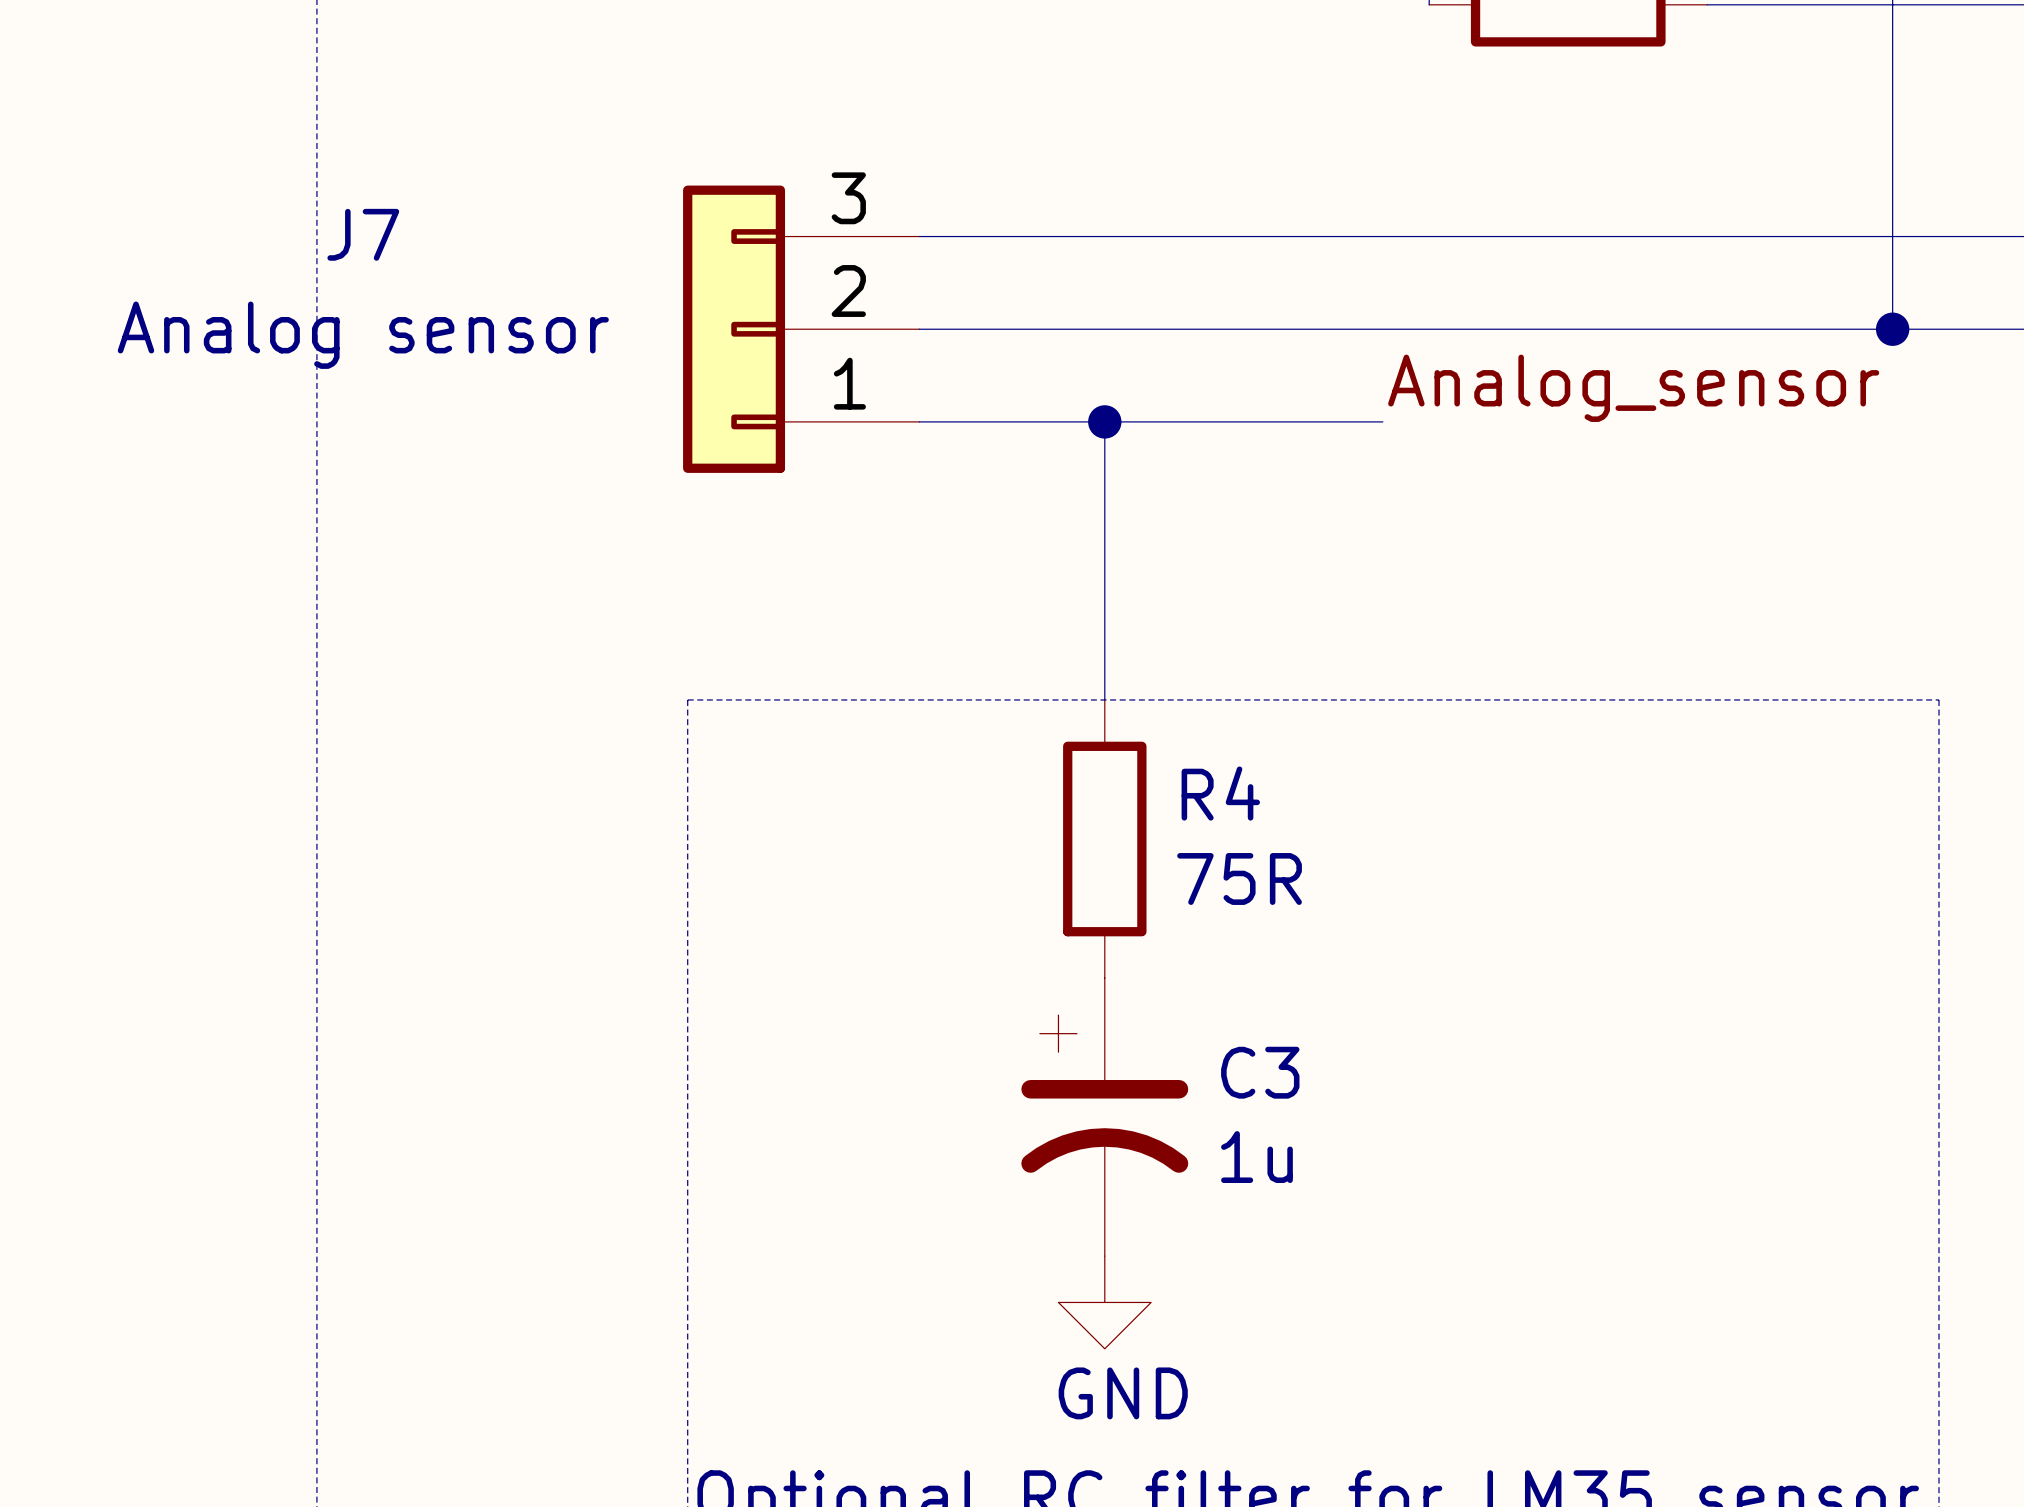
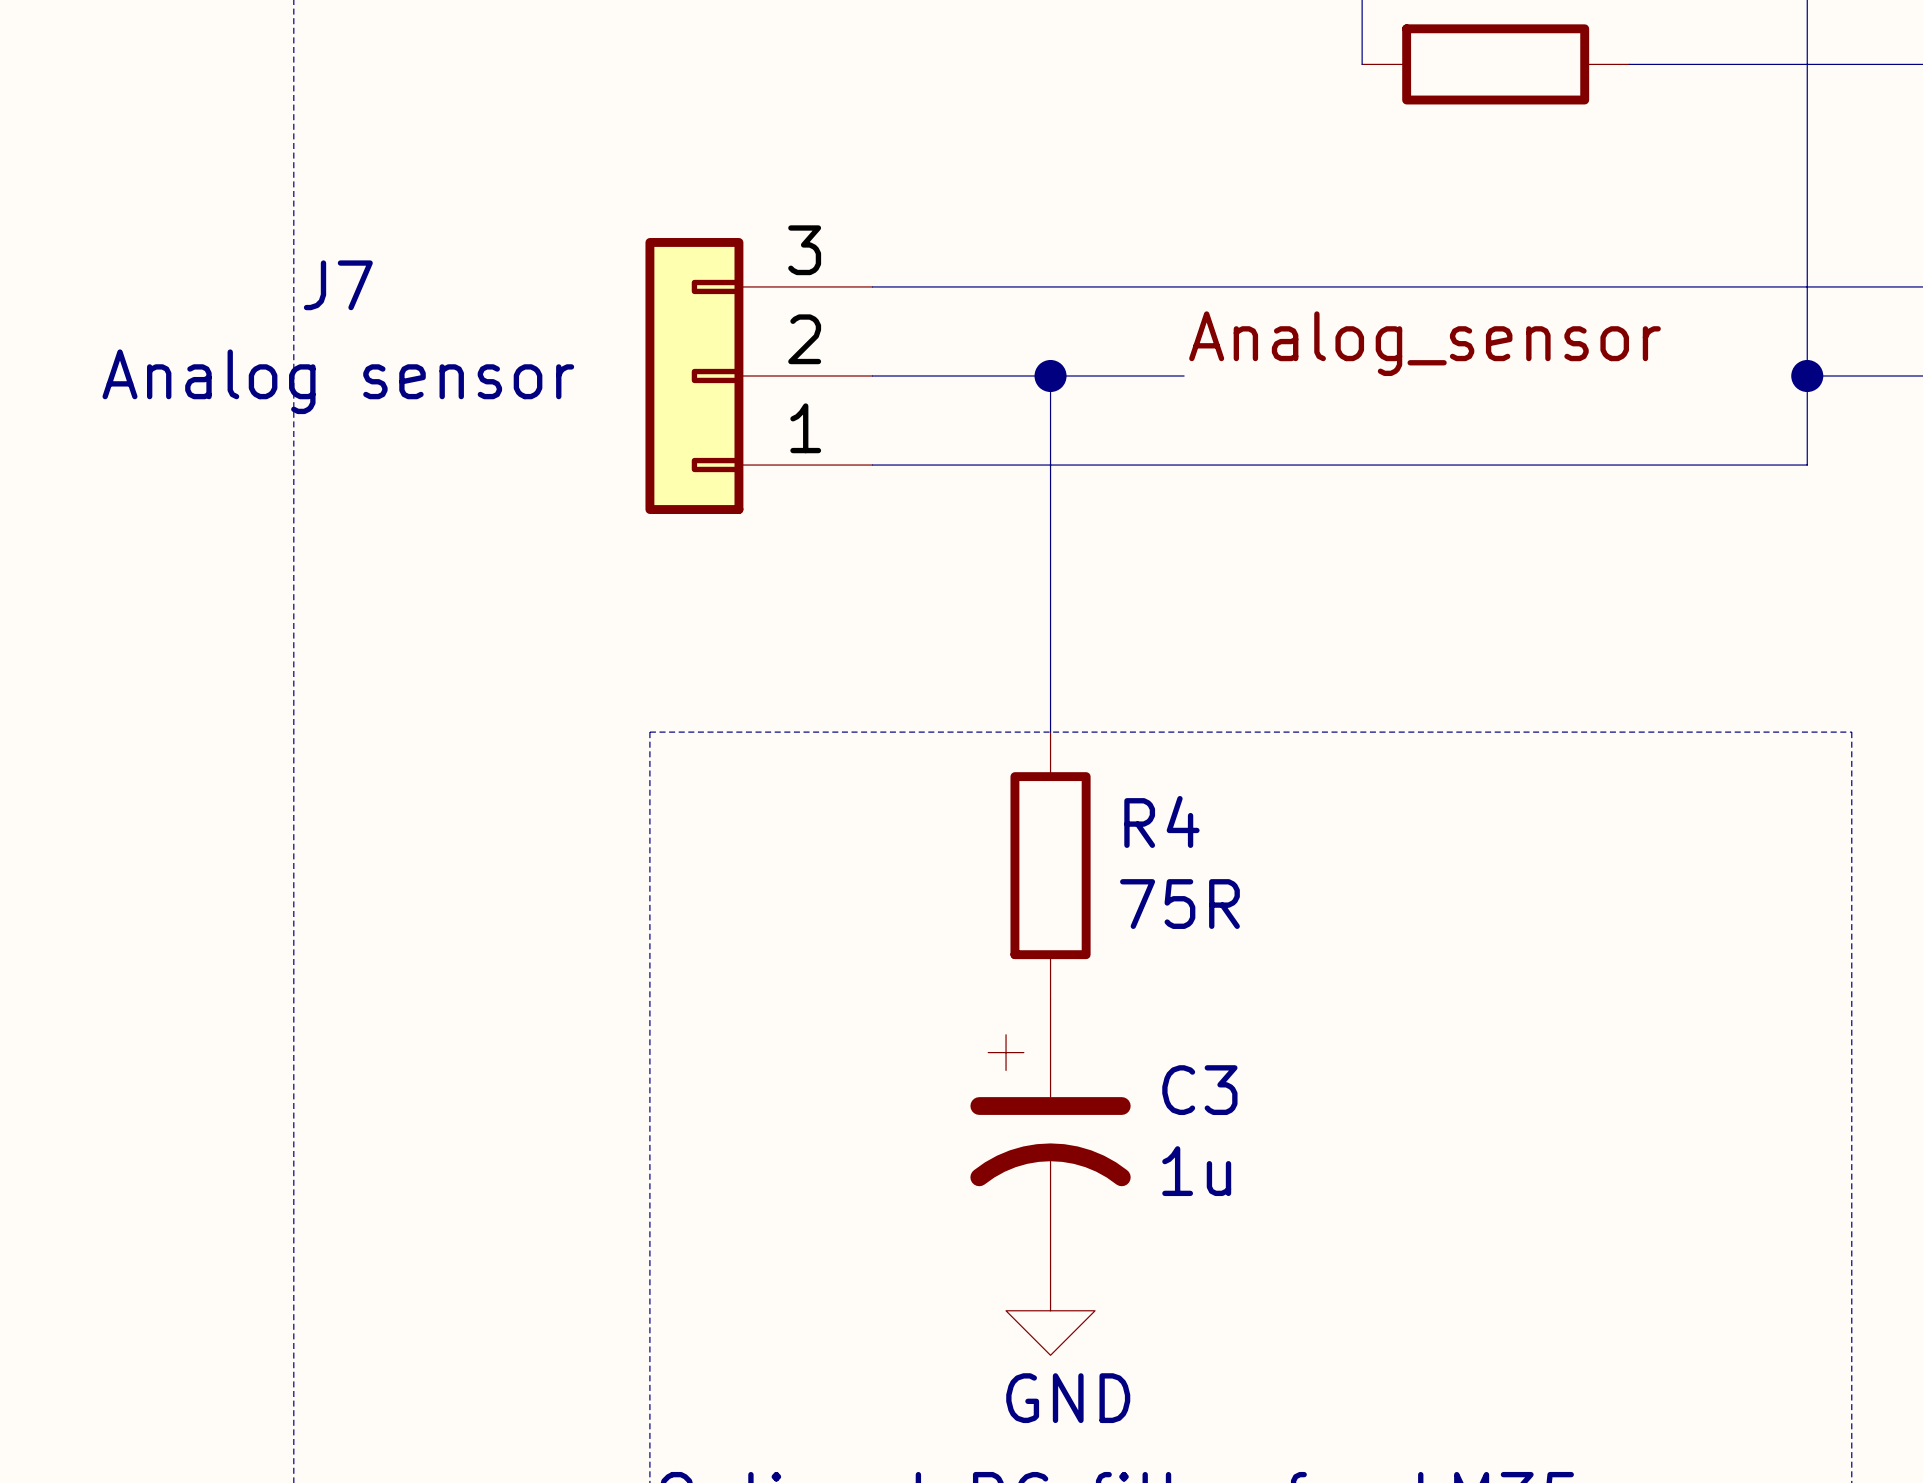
wire: none -> (1050, 375) (1050, 465)
wire: (1243, 329) (1892, 329) -> (1317, 465) (1807, 465) (1807, 375)
label position: Analog_sensor (1633, 388) -> Analog_sensor (1425, 343)
junction position: (1104, 421) -> (1050, 375)

